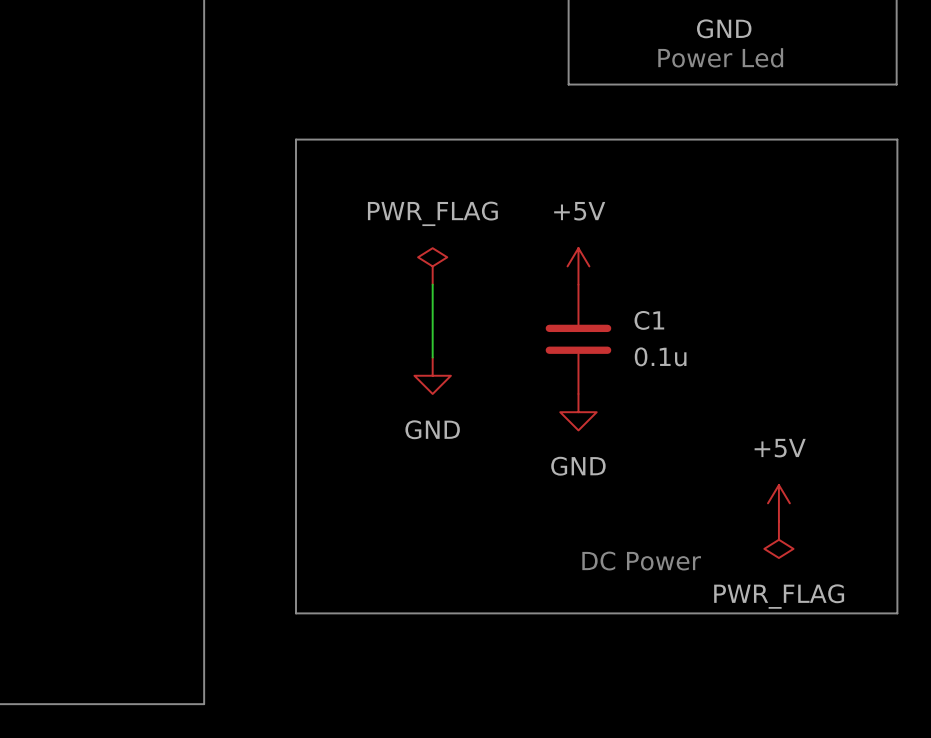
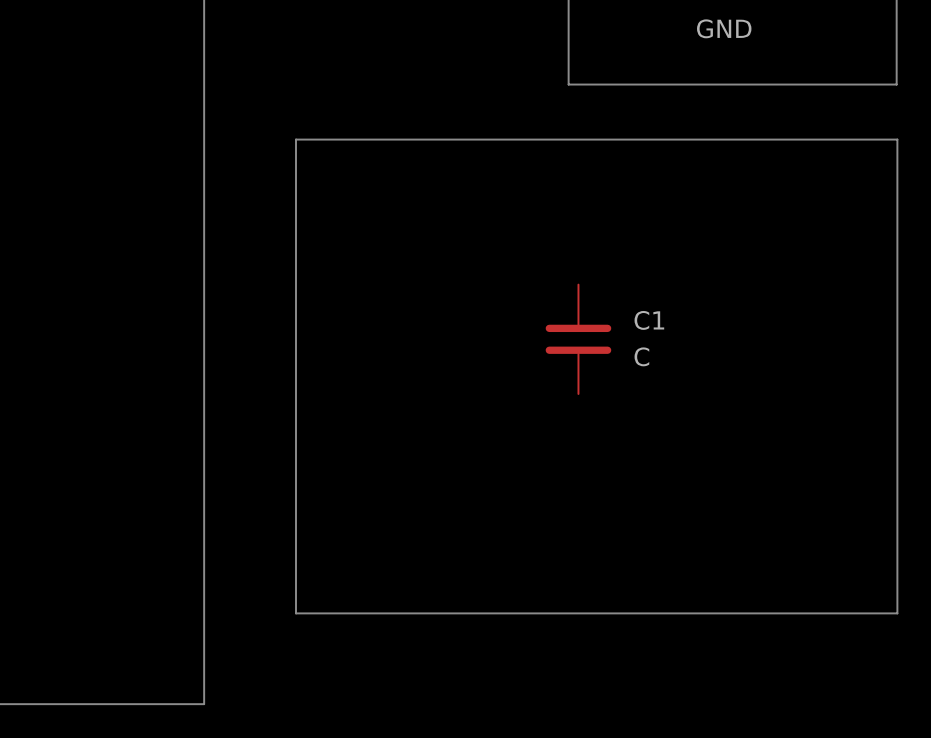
text: Power Led (720, 57) -> none
power symbol: PWR_FLAG (432, 266) -> none
power symbol: +5V (578, 266) -> none
wire: (432, 284) (432, 357) -> none
C1 value: 0.1u (660, 356) -> C (641, 356)
power symbol: GND (432, 375) -> none
power symbol: GND (578, 412) -> none
power symbol: +5V (778, 503) -> none
power symbol: PWR_FLAG (778, 539) -> none
text: DC Power (641, 561) -> none

